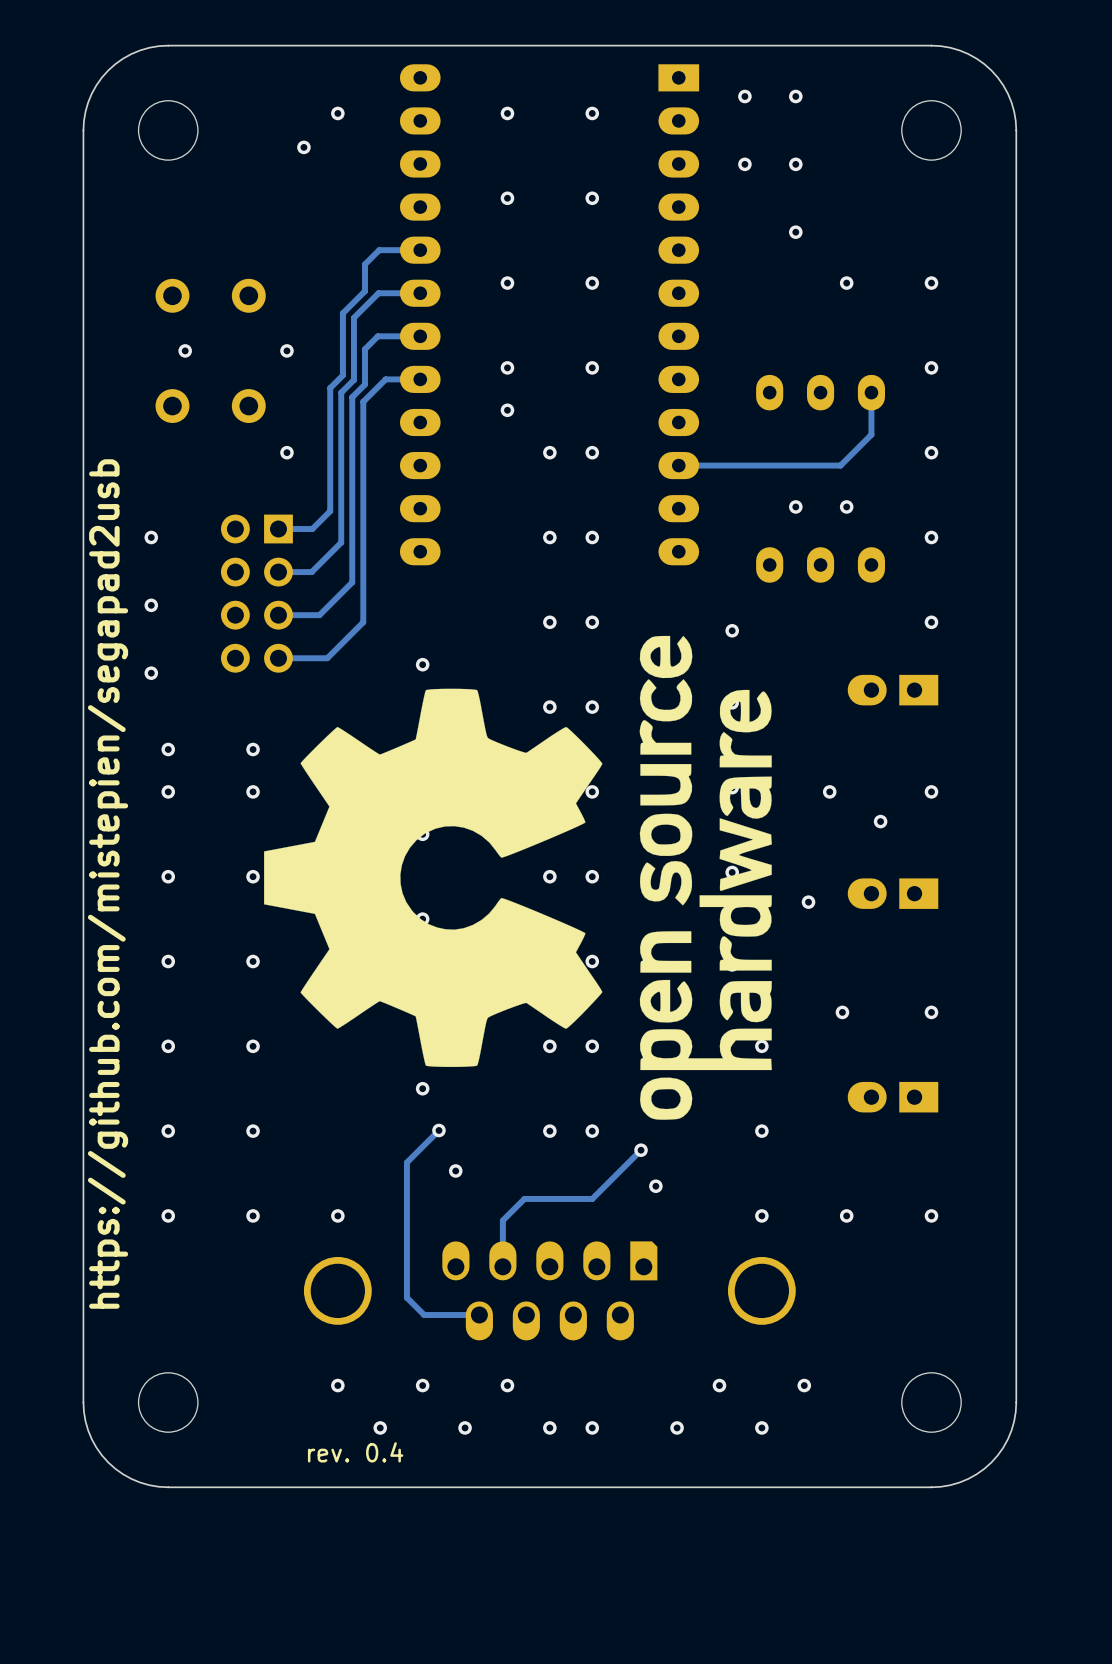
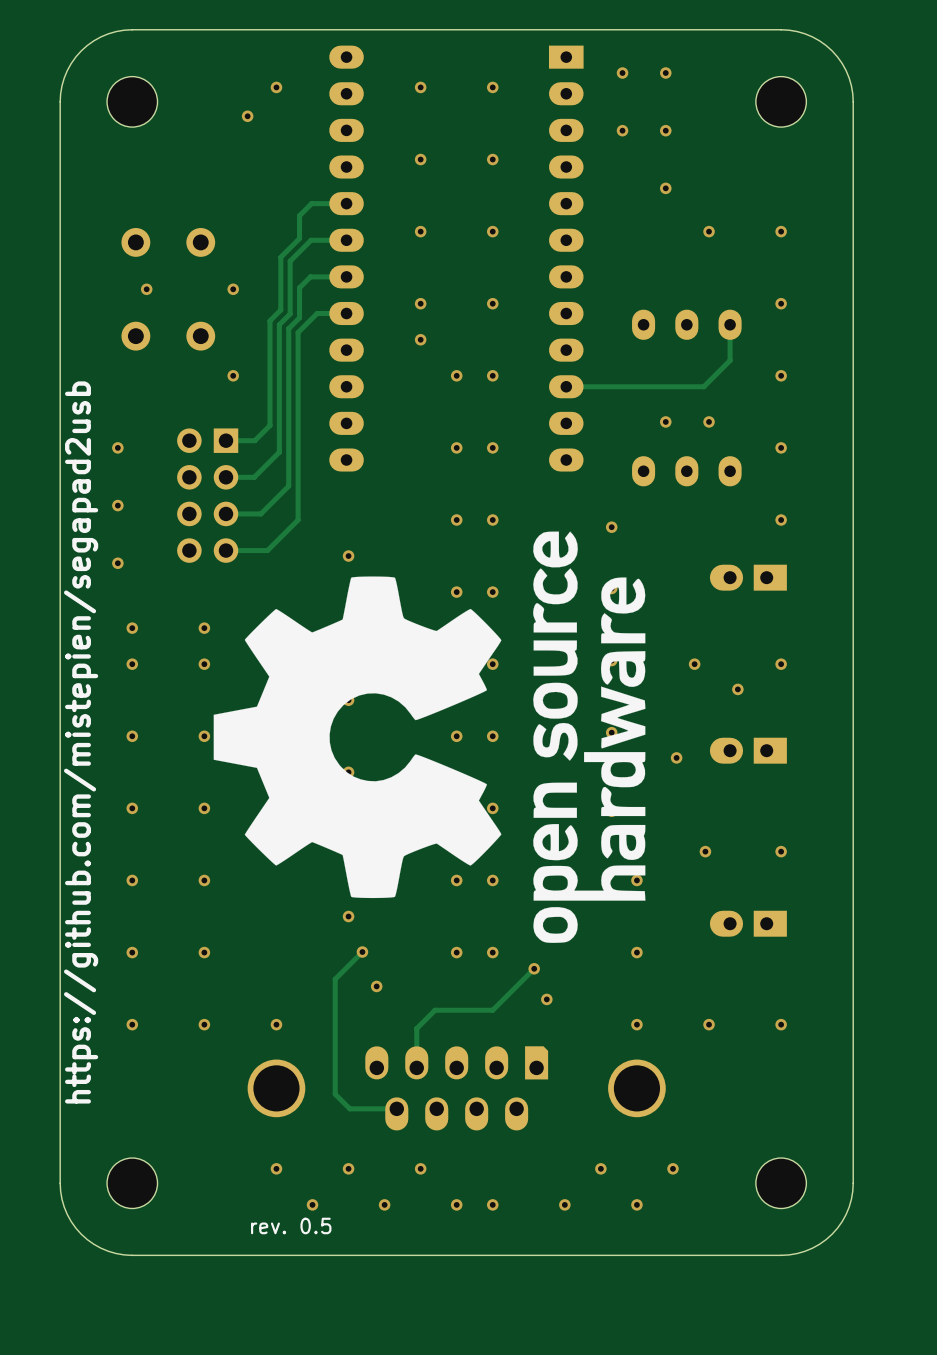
text: rev. 0.4 (355, 1452) -> rev. 0.5 (291, 1225)

